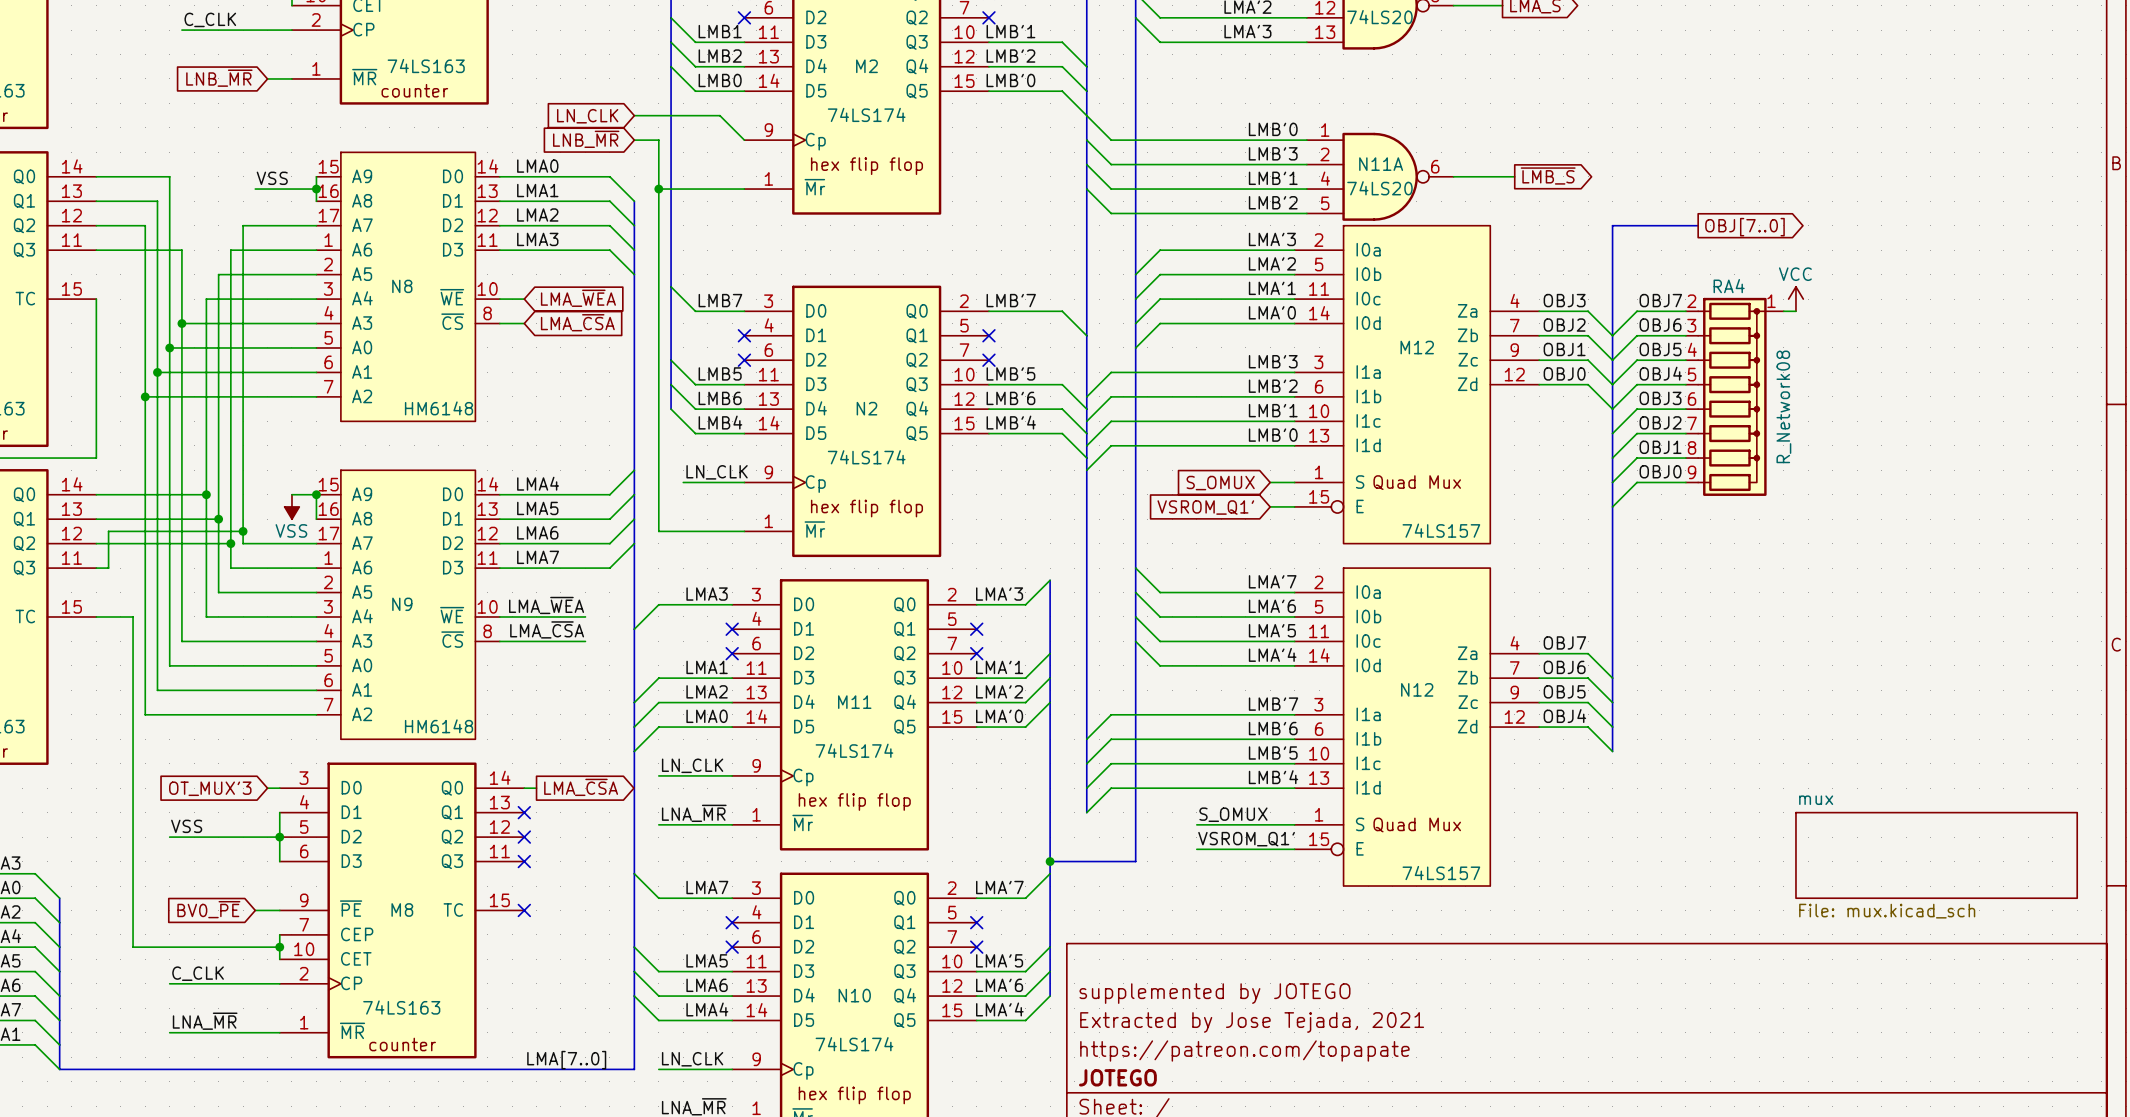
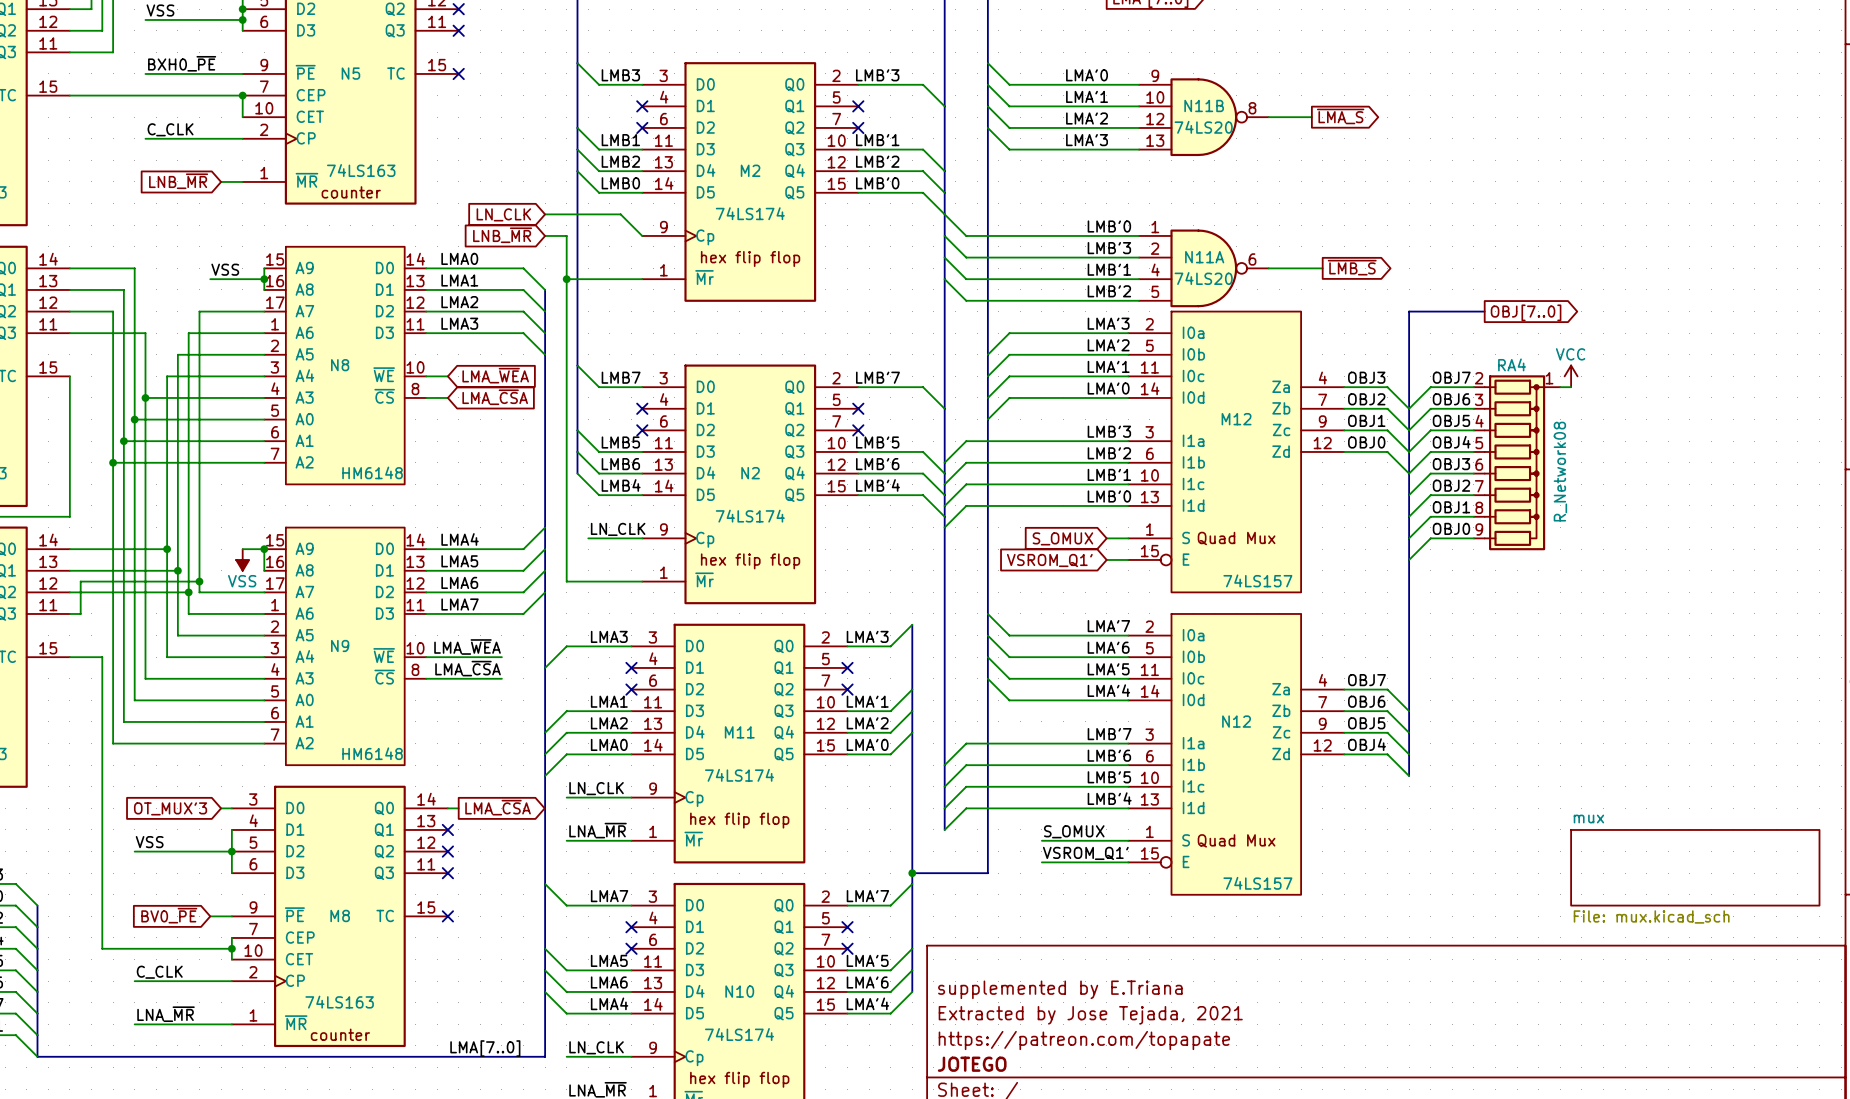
title block: supplemented by JOTEGO (1214, 993) -> supplemented by E.Triana (1060, 989)

